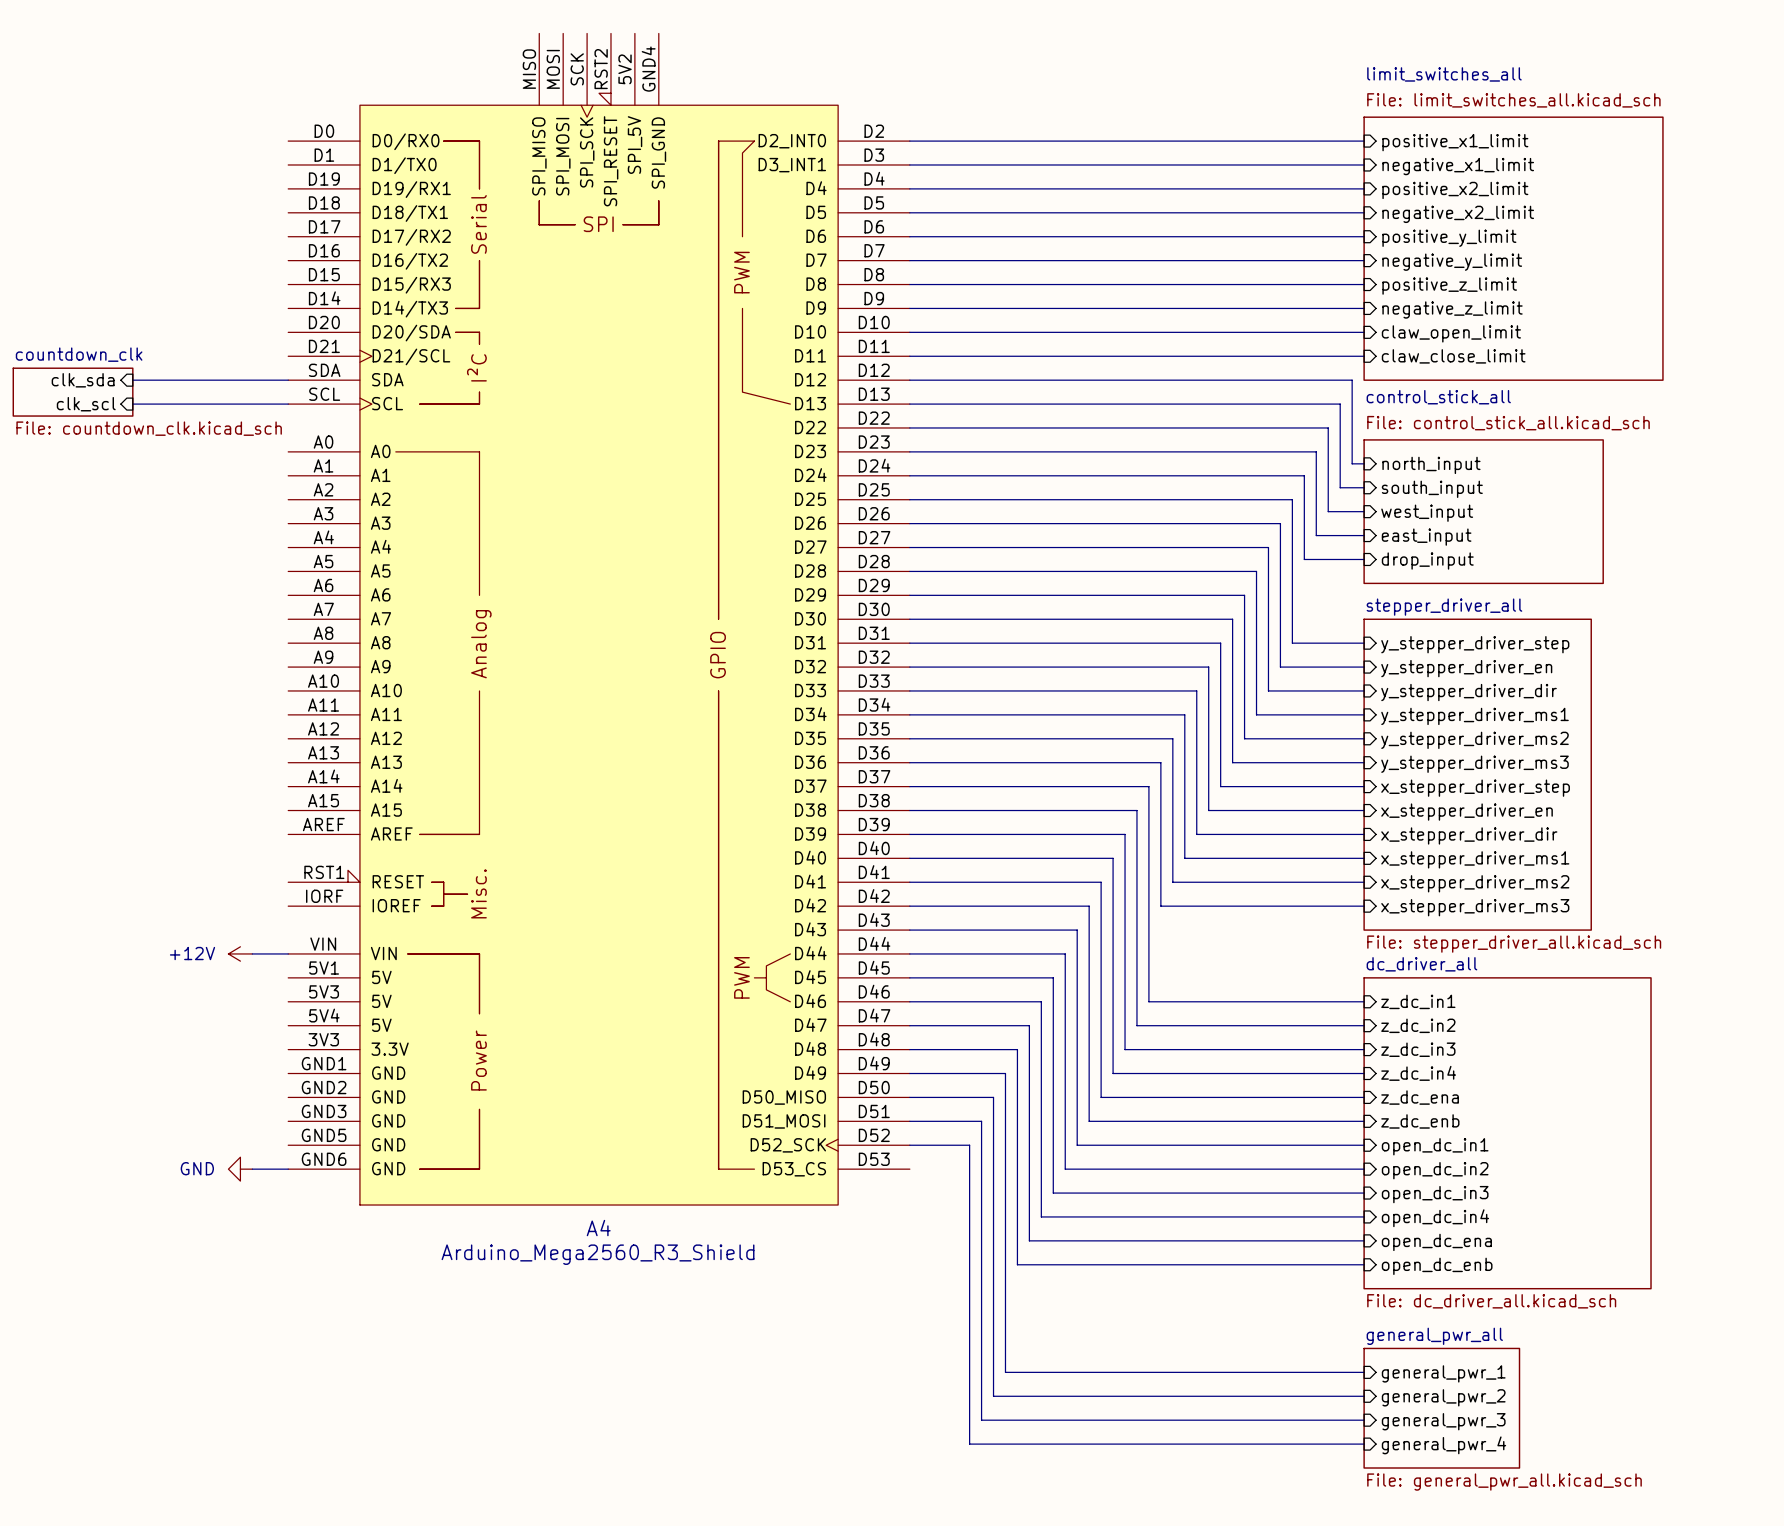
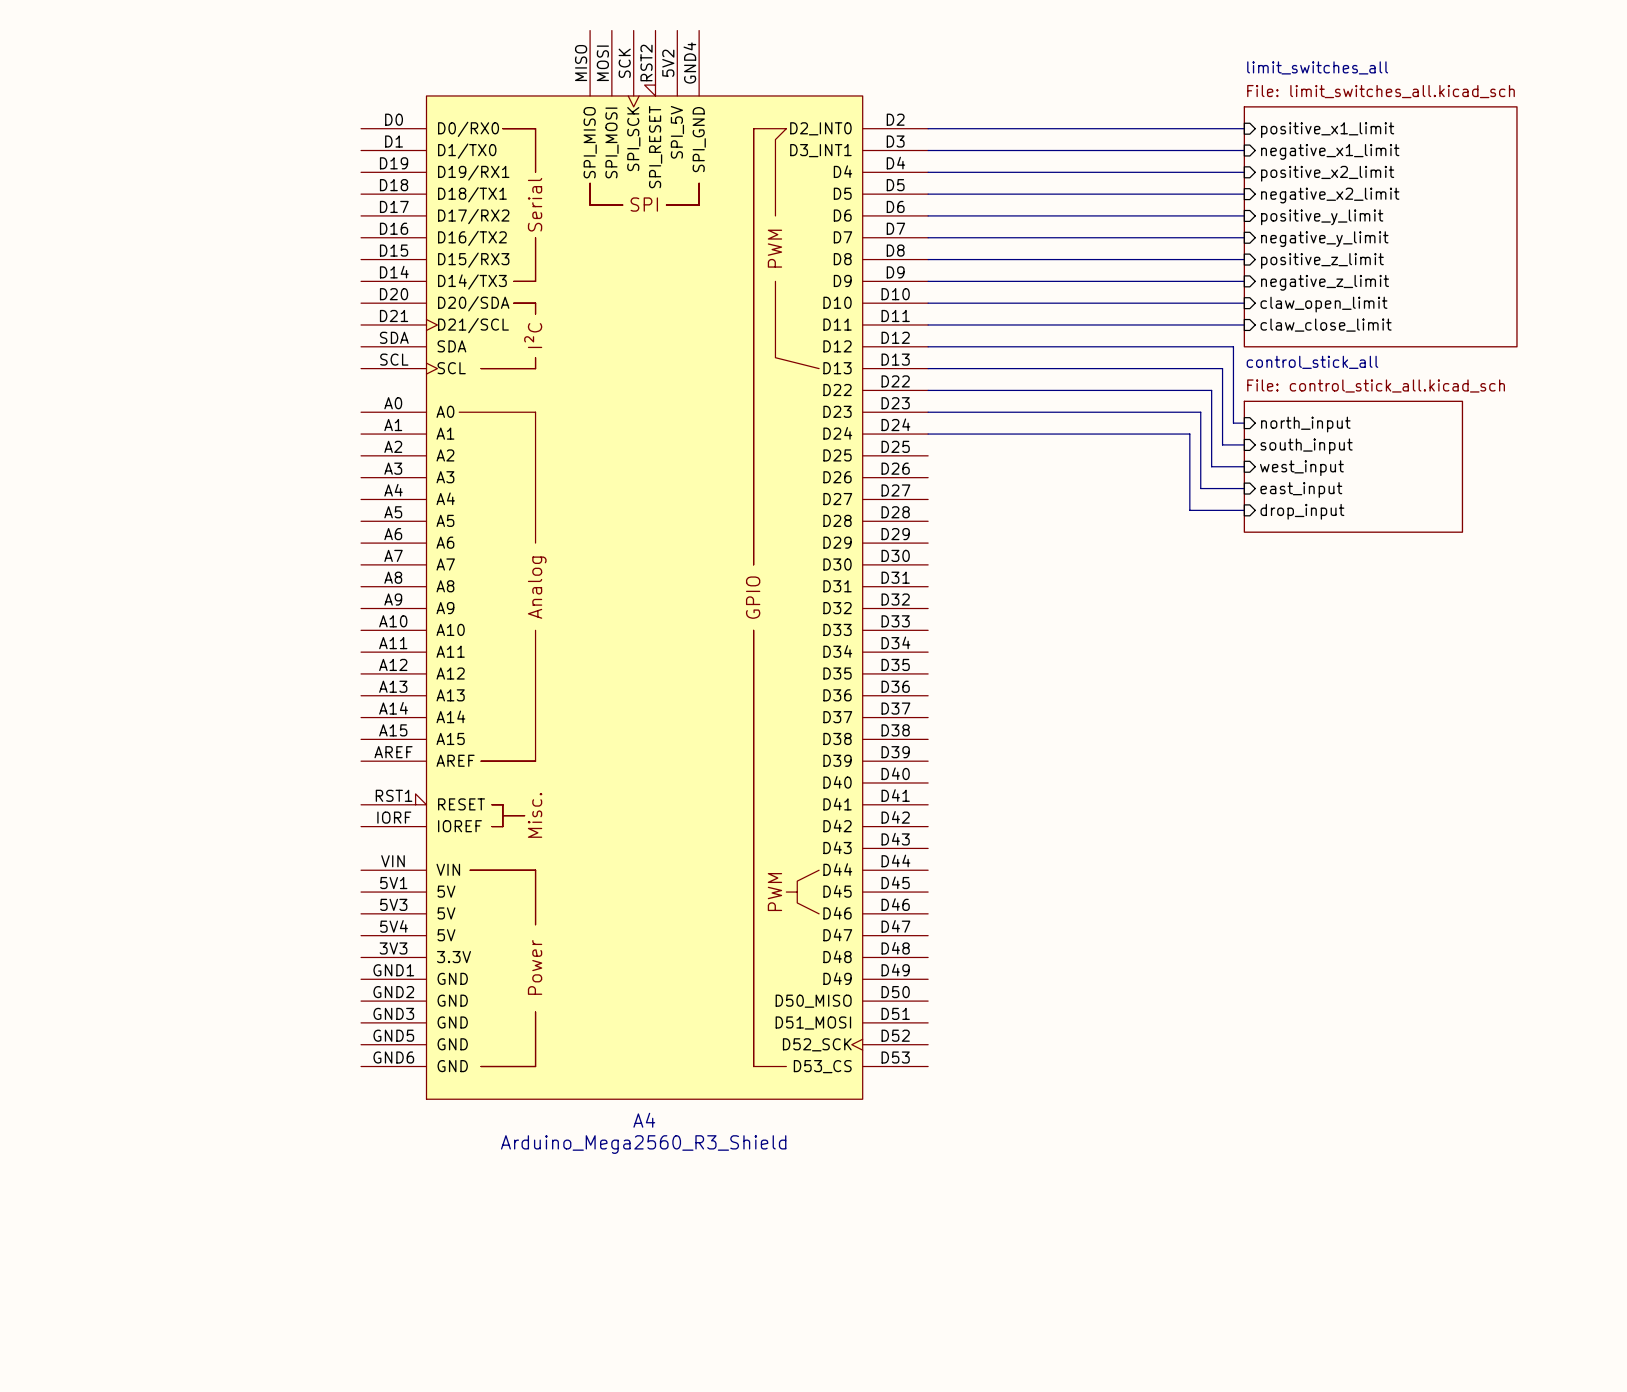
sheet pin: clk_sda (83, 380) -> none
wire: (132, 380) (288, 380) -> none
sheet countdown_clk: File: countdown_clk.kicad_sch (73, 392) -> none
sheet pin: clk_scl (86, 404) -> none
wire: (132, 404) (288, 404) -> none
wire: (909, 499) (1292, 499) (1292, 643) (1364, 643) -> none
wire: (909, 523) (1280, 523) (1280, 667) (1364, 667) -> none
wire: (909, 547) (1268, 547) (1268, 690) (1364, 690) -> none
wire: (909, 571) (1256, 571) (1256, 714) (1364, 714) -> none
wire: (909, 595) (1244, 595) (1244, 738) (1364, 738) -> none
A4 position: (599, 619) -> (644, 564)
wire: (909, 619) (1232, 619) (1232, 762) (1364, 762) -> none
wire: (909, 643) (1220, 643) (1220, 786) (1364, 786) -> none
sheet pin: y_stepper_driver_step (1475, 644) -> none
wire: (909, 667) (1208, 667) (1208, 810) (1364, 810) -> none
sheet pin: y_stepper_driver_en (1466, 668) -> none
wire: (909, 690) (1196, 690) (1196, 834) (1364, 834) -> none
sheet pin: y_stepper_driver_dir (1469, 692) -> none
wire: (909, 714) (1184, 714) (1184, 858) (1364, 858) -> none
sheet pin: y_stepper_driver_ms1 (1475, 716) -> none
wire: (909, 738) (1172, 738) (1172, 882) (1364, 882) -> none
sheet pin: y_stepper_driver_ms2 (1475, 740) -> none
wire: (909, 762) (1160, 762) (1160, 906) (1364, 906) -> none
sheet pin: y_stepper_driver_ms3 (1475, 764) -> none
sheet stepper_driver_all: File: stepper_driver_all.kicad_sch (1477, 774) -> none
wire: (909, 786) (1148, 786) (1148, 1001) (1364, 1001) -> none
sheet pin: x_stepper_driver_step (1475, 788) -> none
wire: (909, 810) (1136, 810) (1136, 1025) (1364, 1025) -> none
sheet pin: x_stepper_driver_en (1467, 812) -> none
wire: (909, 834) (1125, 834) (1125, 1049) (1364, 1049) -> none
sheet pin: x_stepper_driver_dir (1469, 835) -> none
wire: (909, 858) (1113, 858) (1113, 1073) (1364, 1073) -> none
sheet pin: x_stepper_driver_ms1 (1475, 859) -> none
wire: (909, 882) (1101, 882) (1101, 1097) (1364, 1097) -> none
sheet pin: x_stepper_driver_ms2 (1475, 883) -> none
wire: (909, 906) (1089, 906) (1089, 1121) (1364, 1121) -> none
sheet pin: x_stepper_driver_ms3 (1475, 907) -> none
wire: (909, 930) (1077, 930) (1077, 1145) (1364, 1145) -> none
power symbol: +12V (240, 953) -> none
wire: (252, 953) (288, 953) -> none
wire: (909, 953) (1065, 953) (1065, 1169) (1364, 1169) -> none
wire: (909, 977) (1053, 977) (1053, 1193) (1364, 1193) -> none
wire: (909, 1001) (1041, 1001) (1041, 1216) (1364, 1216) -> none
sheet pin: z_dc_in1 (1418, 1001) -> none
wire: (909, 1025) (1029, 1025) (1029, 1240) (1364, 1240) -> none
sheet pin: z_dc_in2 (1418, 1025) -> none
wire: (909, 1049) (1017, 1049) (1017, 1264) (1364, 1264) -> none
sheet pin: z_dc_in3 (1418, 1049) -> none
wire: (909, 1073) (1005, 1073) (1005, 1372) (1364, 1372) -> none
sheet pin: z_dc_in4 (1418, 1073) -> none
wire: (909, 1097) (993, 1097) (993, 1396) (1364, 1396) -> none
sheet pin: z_dc_ena (1420, 1097) -> none
wire: (909, 1121) (981, 1121) (981, 1420) (1364, 1420) -> none
sheet pin: z_dc_enb (1420, 1121) -> none
sheet dc_driver_all: File: dc_driver_all.kicad_sch (1507, 1133) -> none
wire: (909, 1145) (969, 1145) (969, 1444) (1364, 1444) -> none
sheet pin: open_dc_in1 (1435, 1146) -> none
power symbol: GND (240, 1169) -> none
wire: (252, 1169) (288, 1169) -> none
sheet pin: open_dc_in2 (1435, 1170) -> none
sheet pin: open_dc_in3 (1435, 1194) -> none
sheet pin: open_dc_in4 (1435, 1218) -> none
sheet pin: open_dc_ena (1436, 1242) -> none
sheet pin: open_dc_enb (1437, 1266) -> none
sheet pin: general_pwr_1 (1443, 1373) -> none
sheet pin: general_pwr_2 (1443, 1397) -> none
sheet general_pwr_all: File: general_pwr_all.kicad_sch (1441, 1408) -> none
sheet pin: general_pwr_3 (1443, 1421) -> none
sheet pin: general_pwr_4 (1443, 1445) -> none

